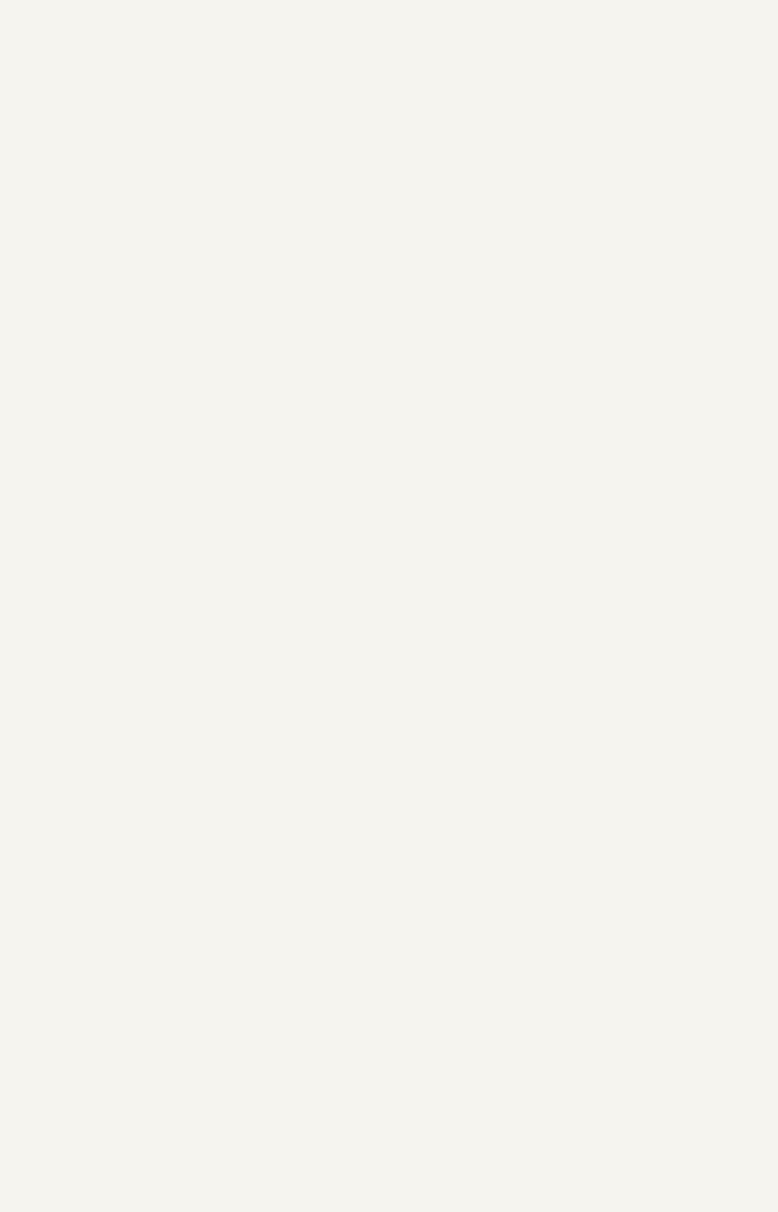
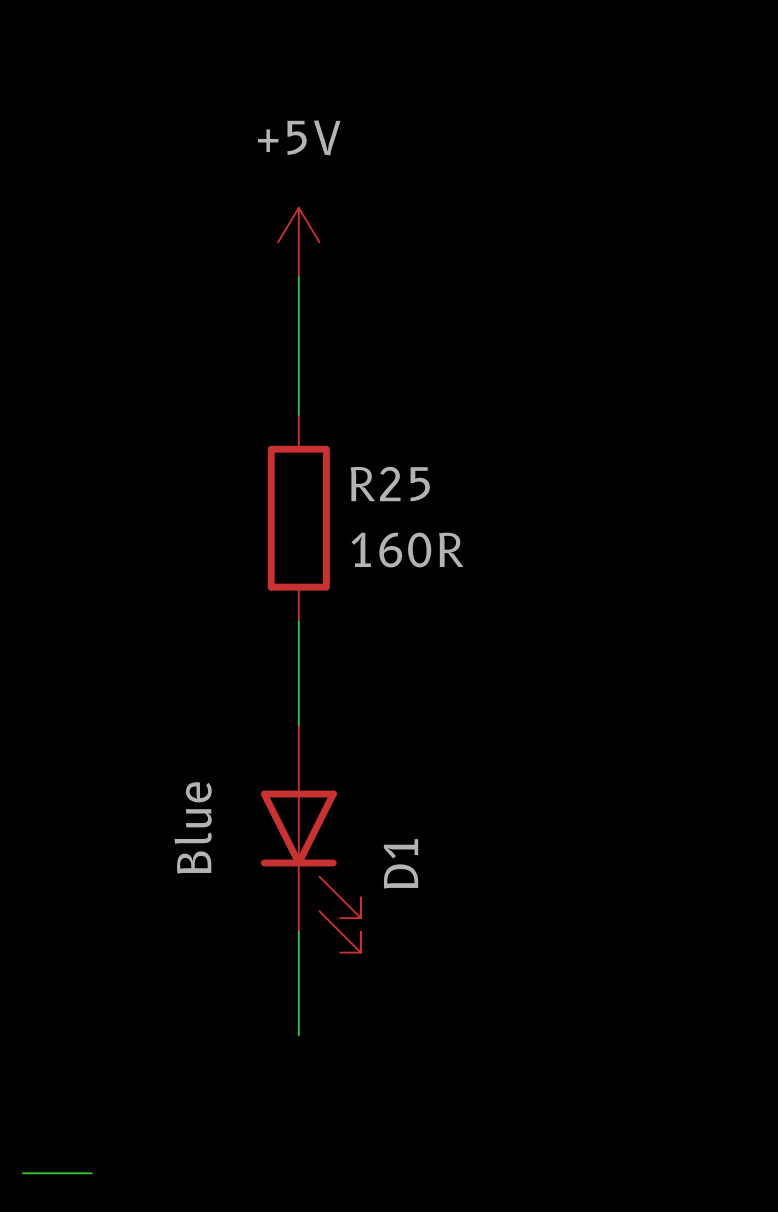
power symbol: none -> +5V (298, 242)
wire: none -> (298, 276) (298, 414)
R25: none -> 160R (298, 518)
wire: none -> (298, 621) (298, 725)
D1: none -> Blue (310, 838)
wire: none -> (298, 931) (298, 1035)
wire: none -> (22, 1173) (91, 1173)

